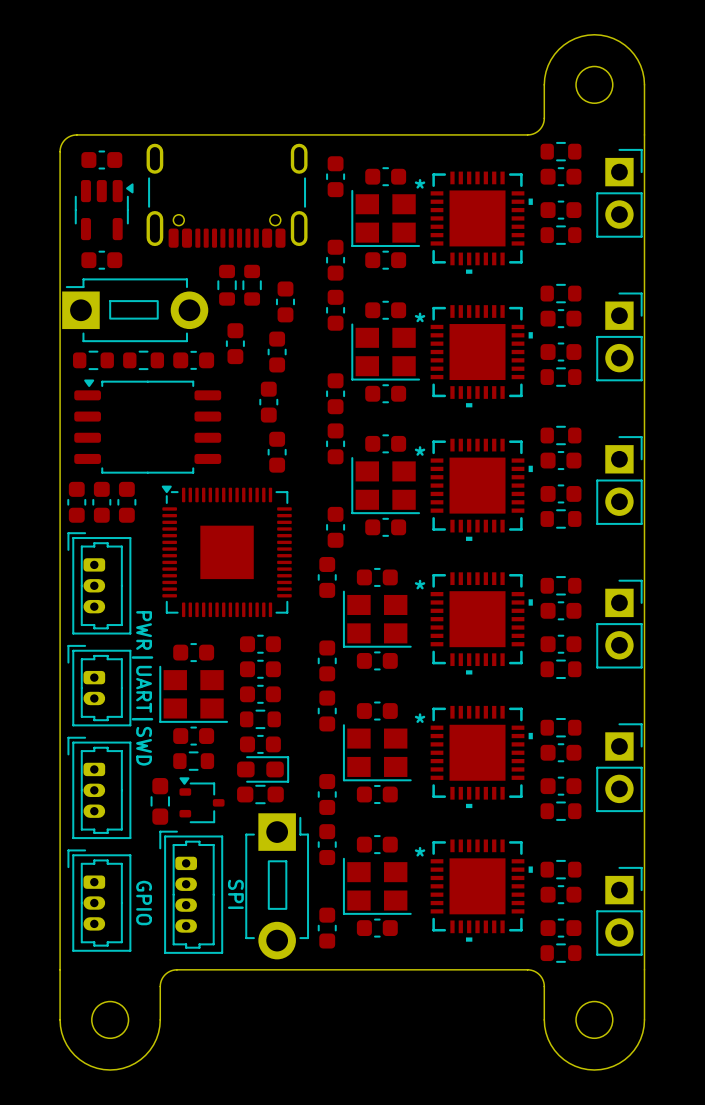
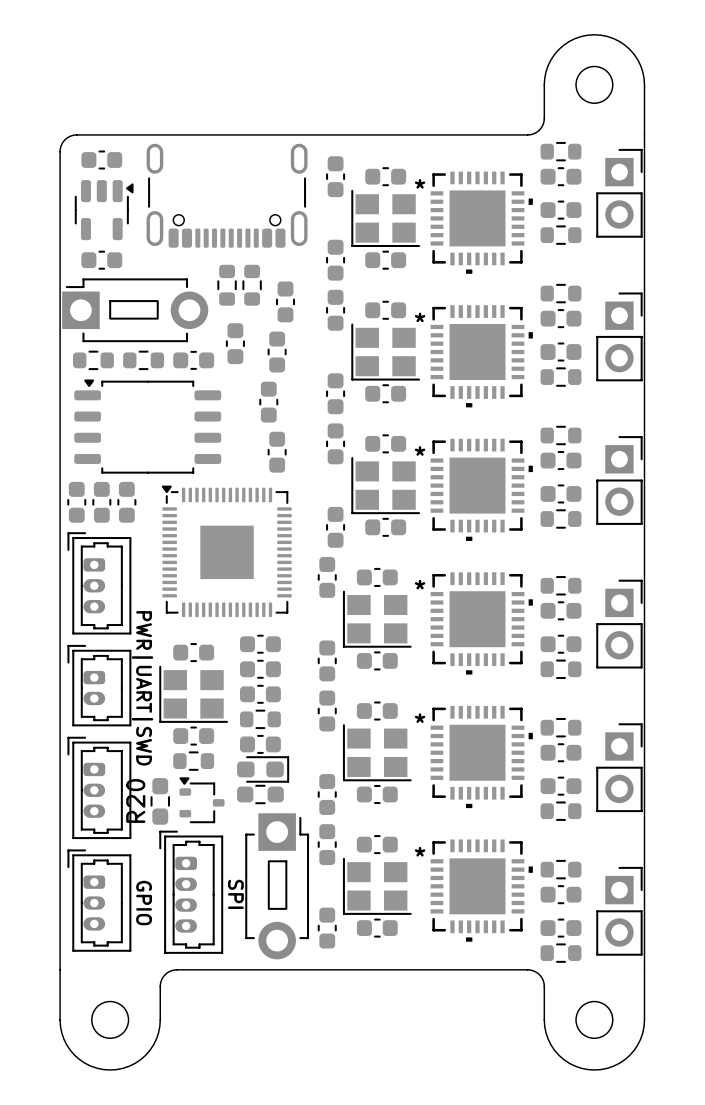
R20 name: none -> R20 (135, 800)

